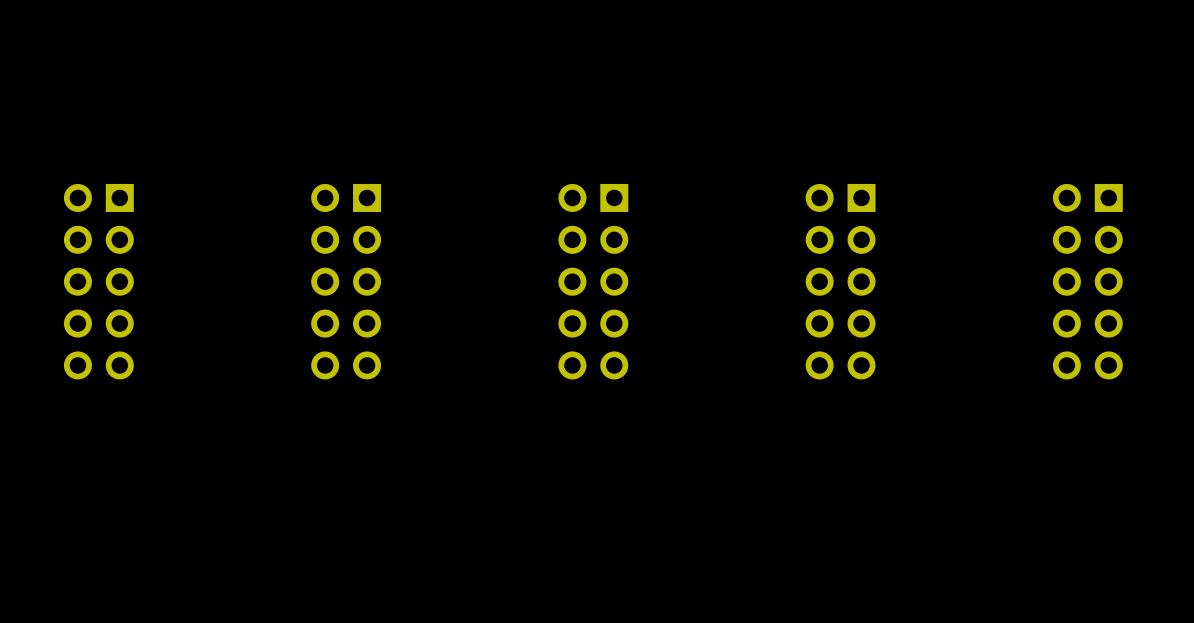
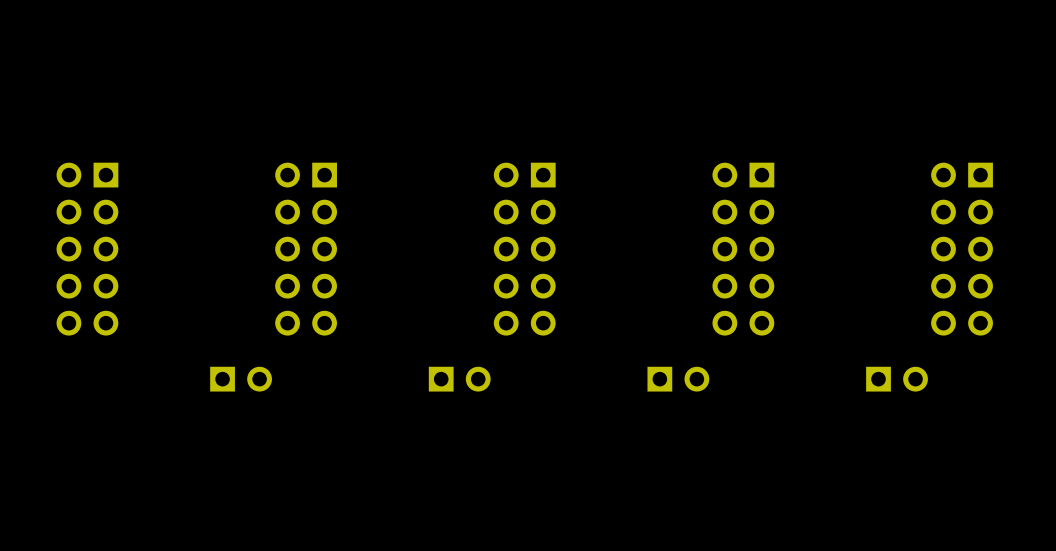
part: none -> (241, 379)
part: none -> (459, 379)
part: none -> (678, 379)
part: none -> (897, 379)

